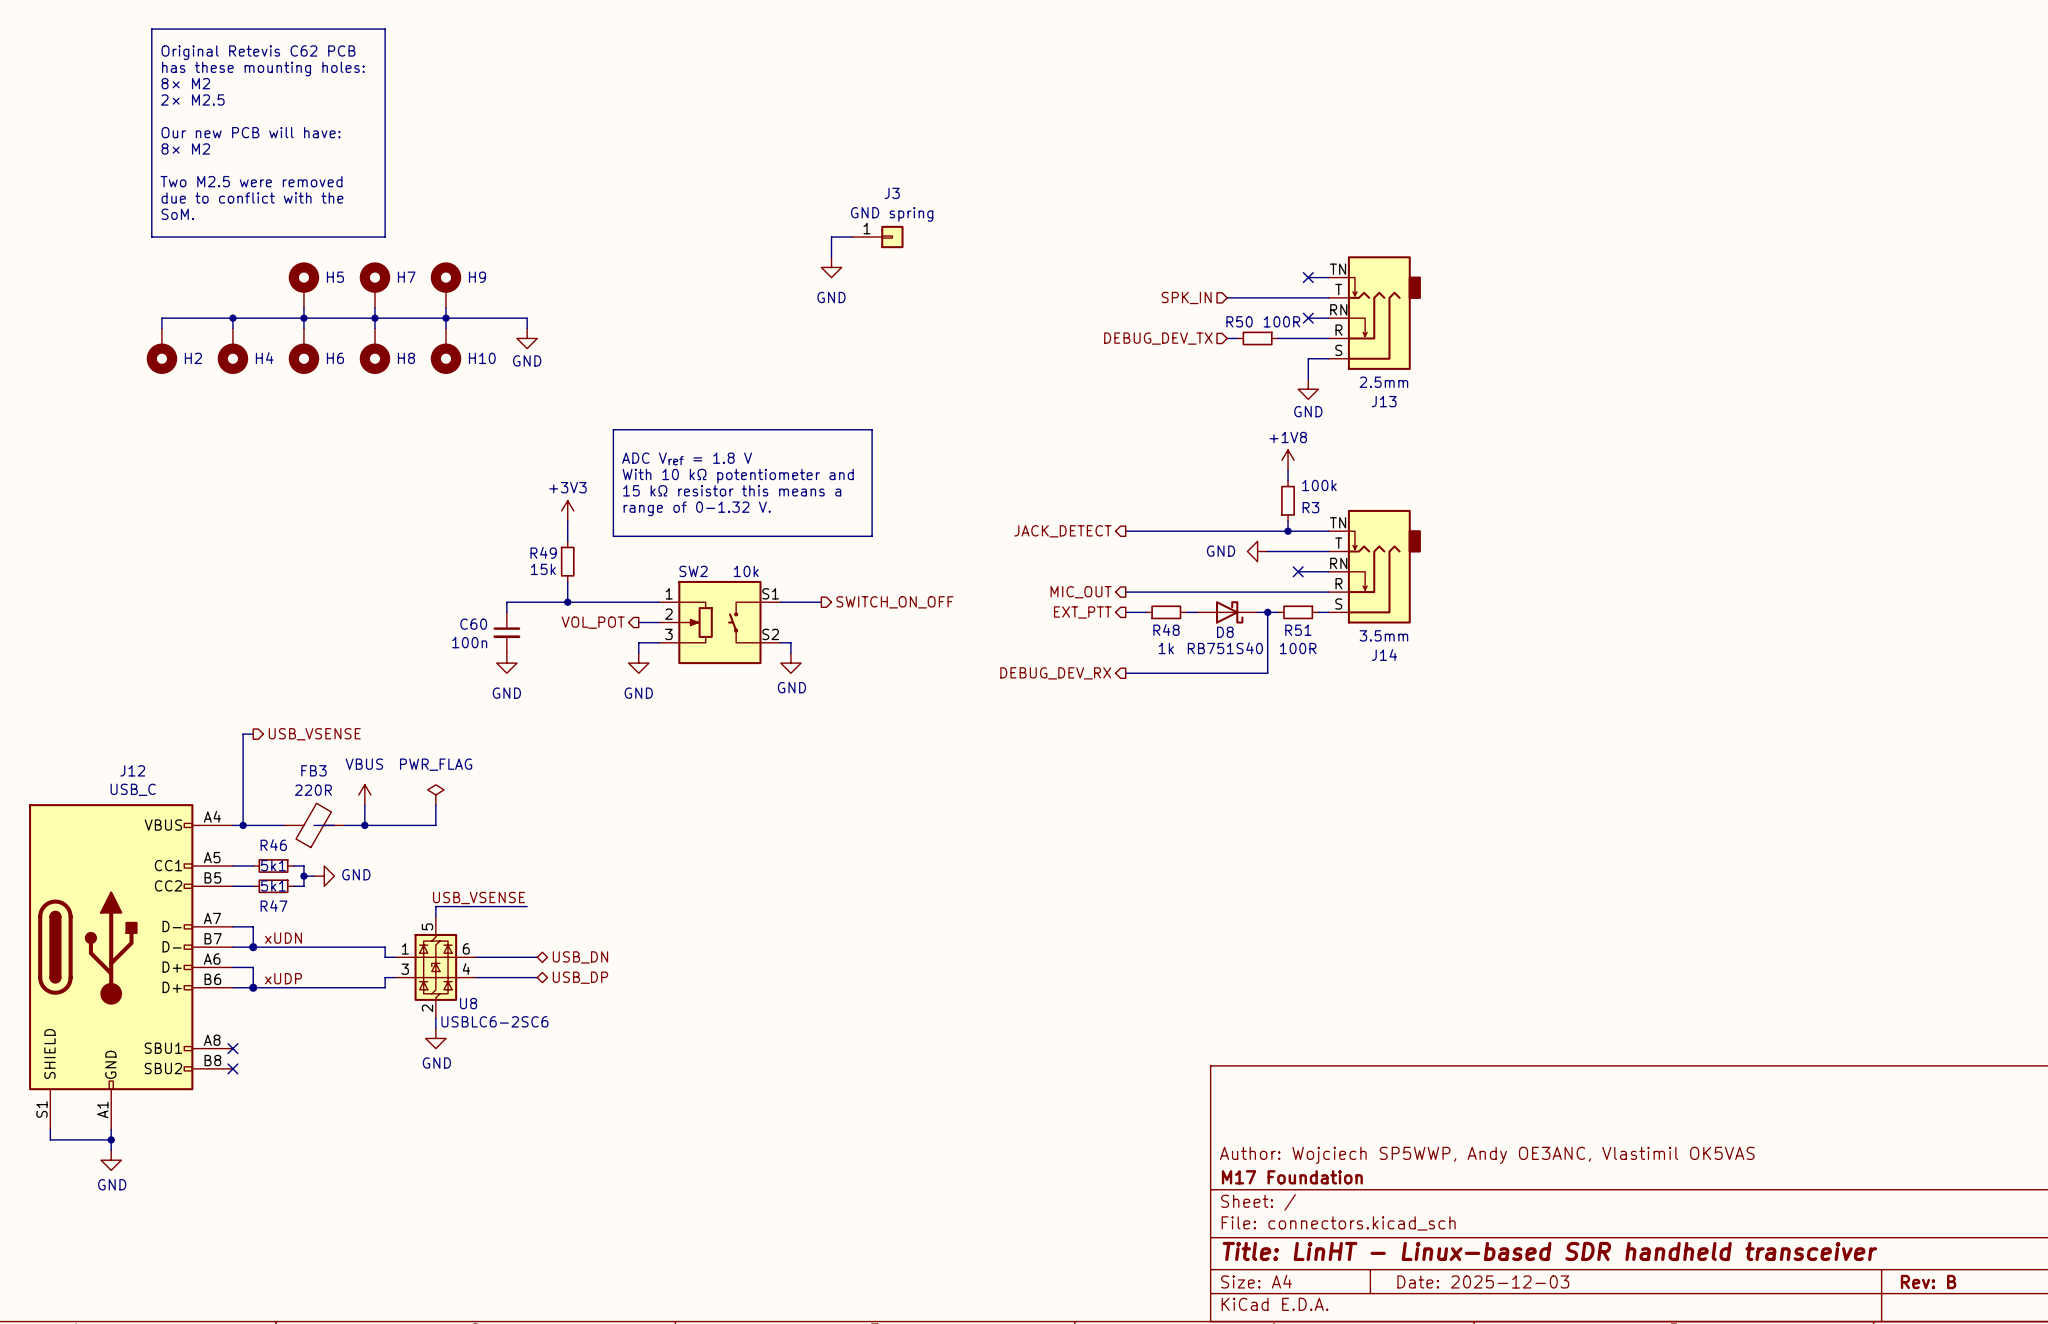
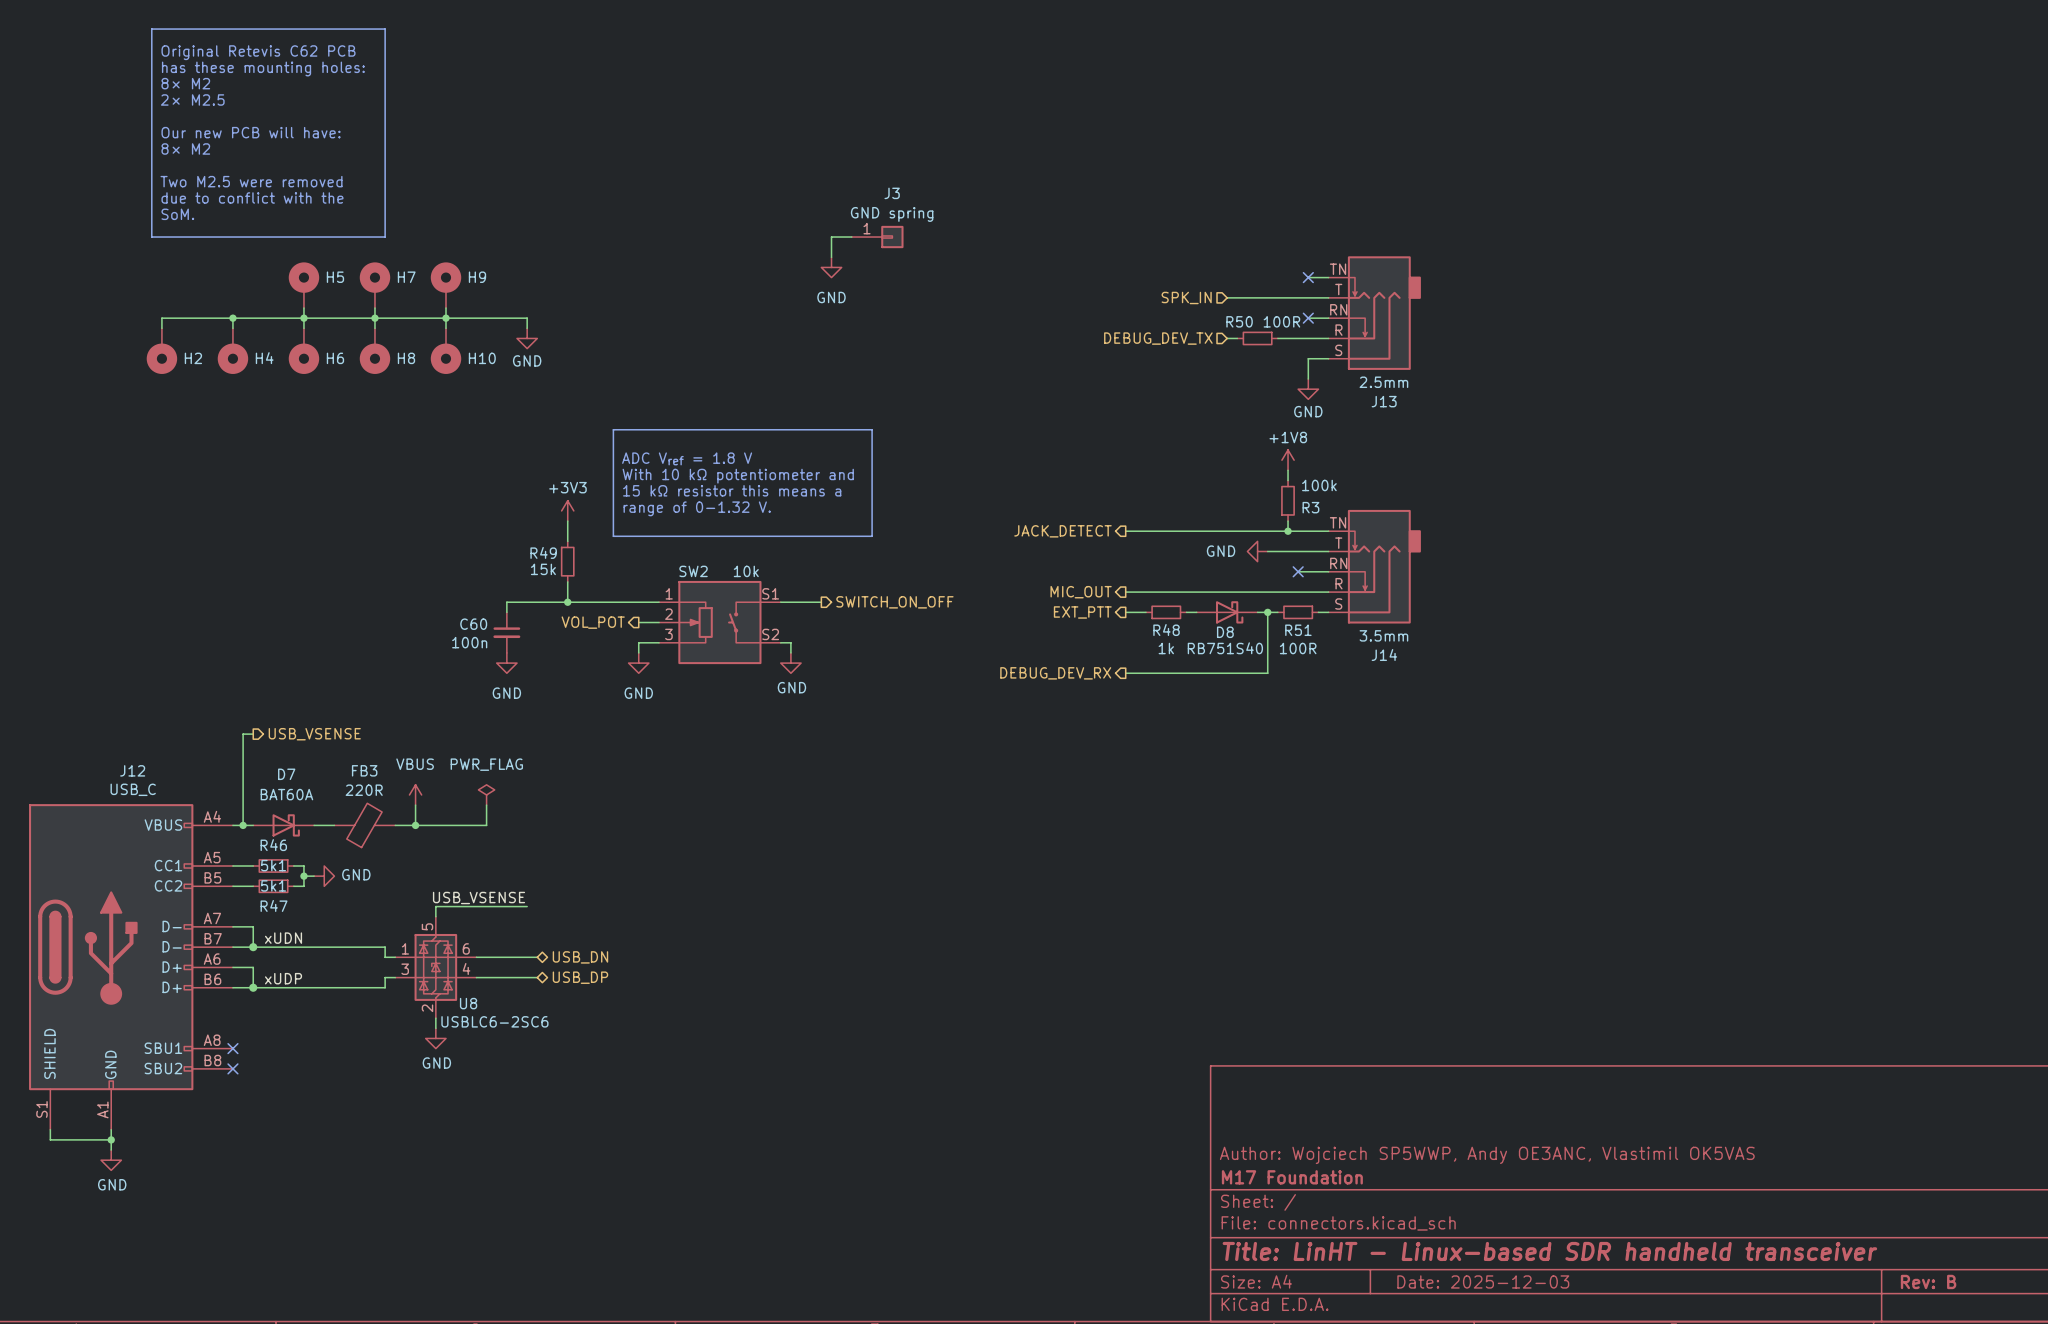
power symbol position: VBUS (364, 794) -> VBUS (415, 794)
power symbol position: PWR_FLAG (435, 794) -> PWR_FLAG (486, 794)
wire: (364, 805) (364, 825) -> (415, 805) (415, 825)
wire: (435, 805) (435, 825) -> (486, 805) (486, 825) (435, 825)
D7: none -> BAT60A (283, 825)
FB3 position: (314, 825) -> (364, 825)
junction: (364, 825) -> none
junction: none -> (415, 825)

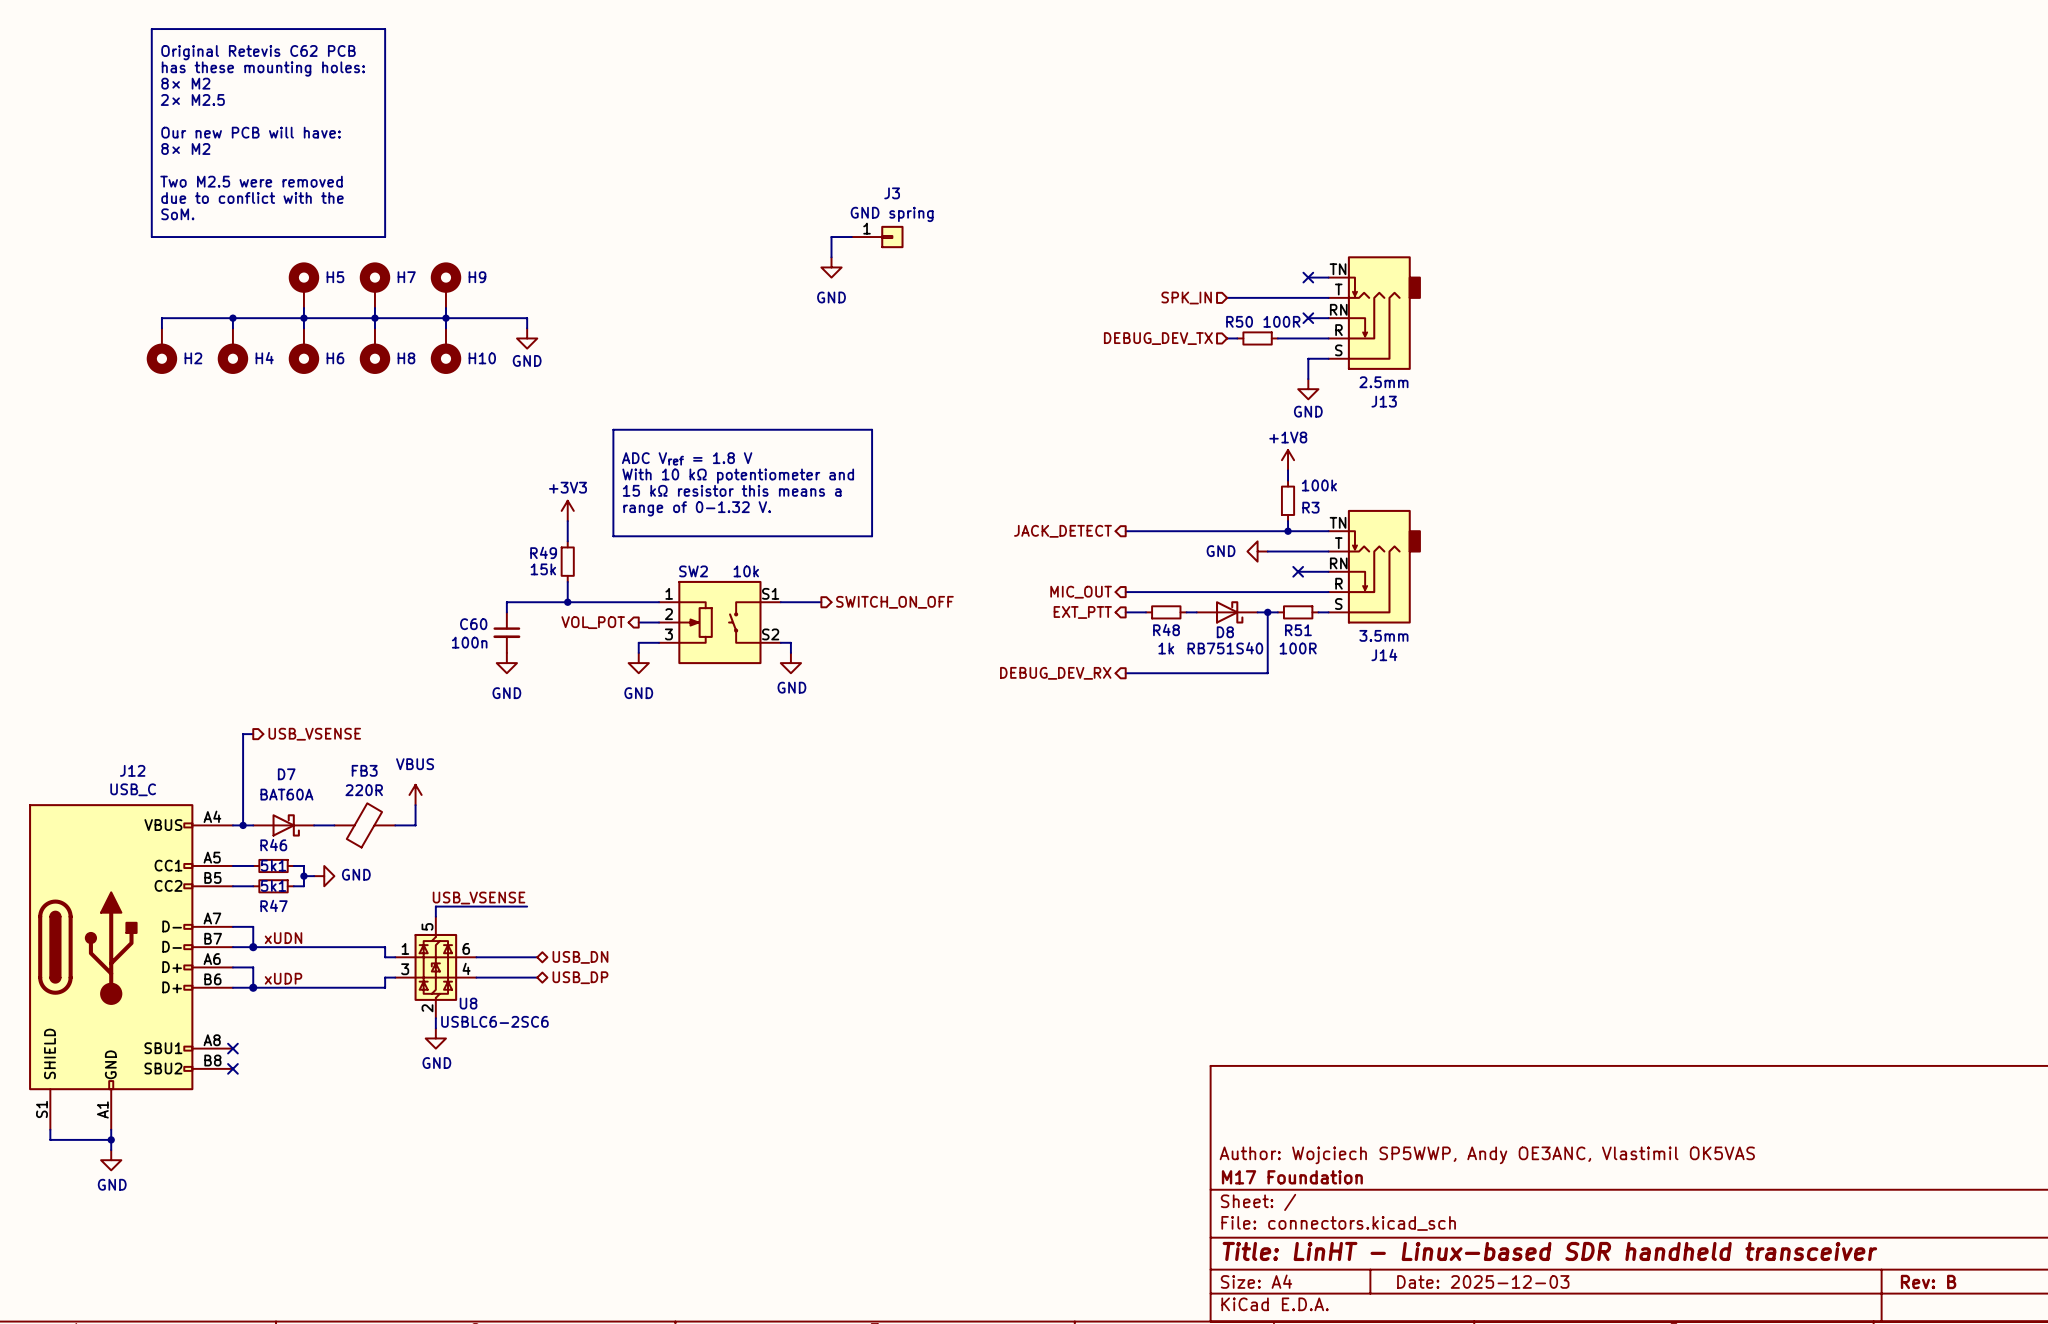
power symbol: PWR_FLAG (486, 794) -> none
wire: (486, 805) (486, 825) (415, 825) -> none
junction: (415, 825) -> none

